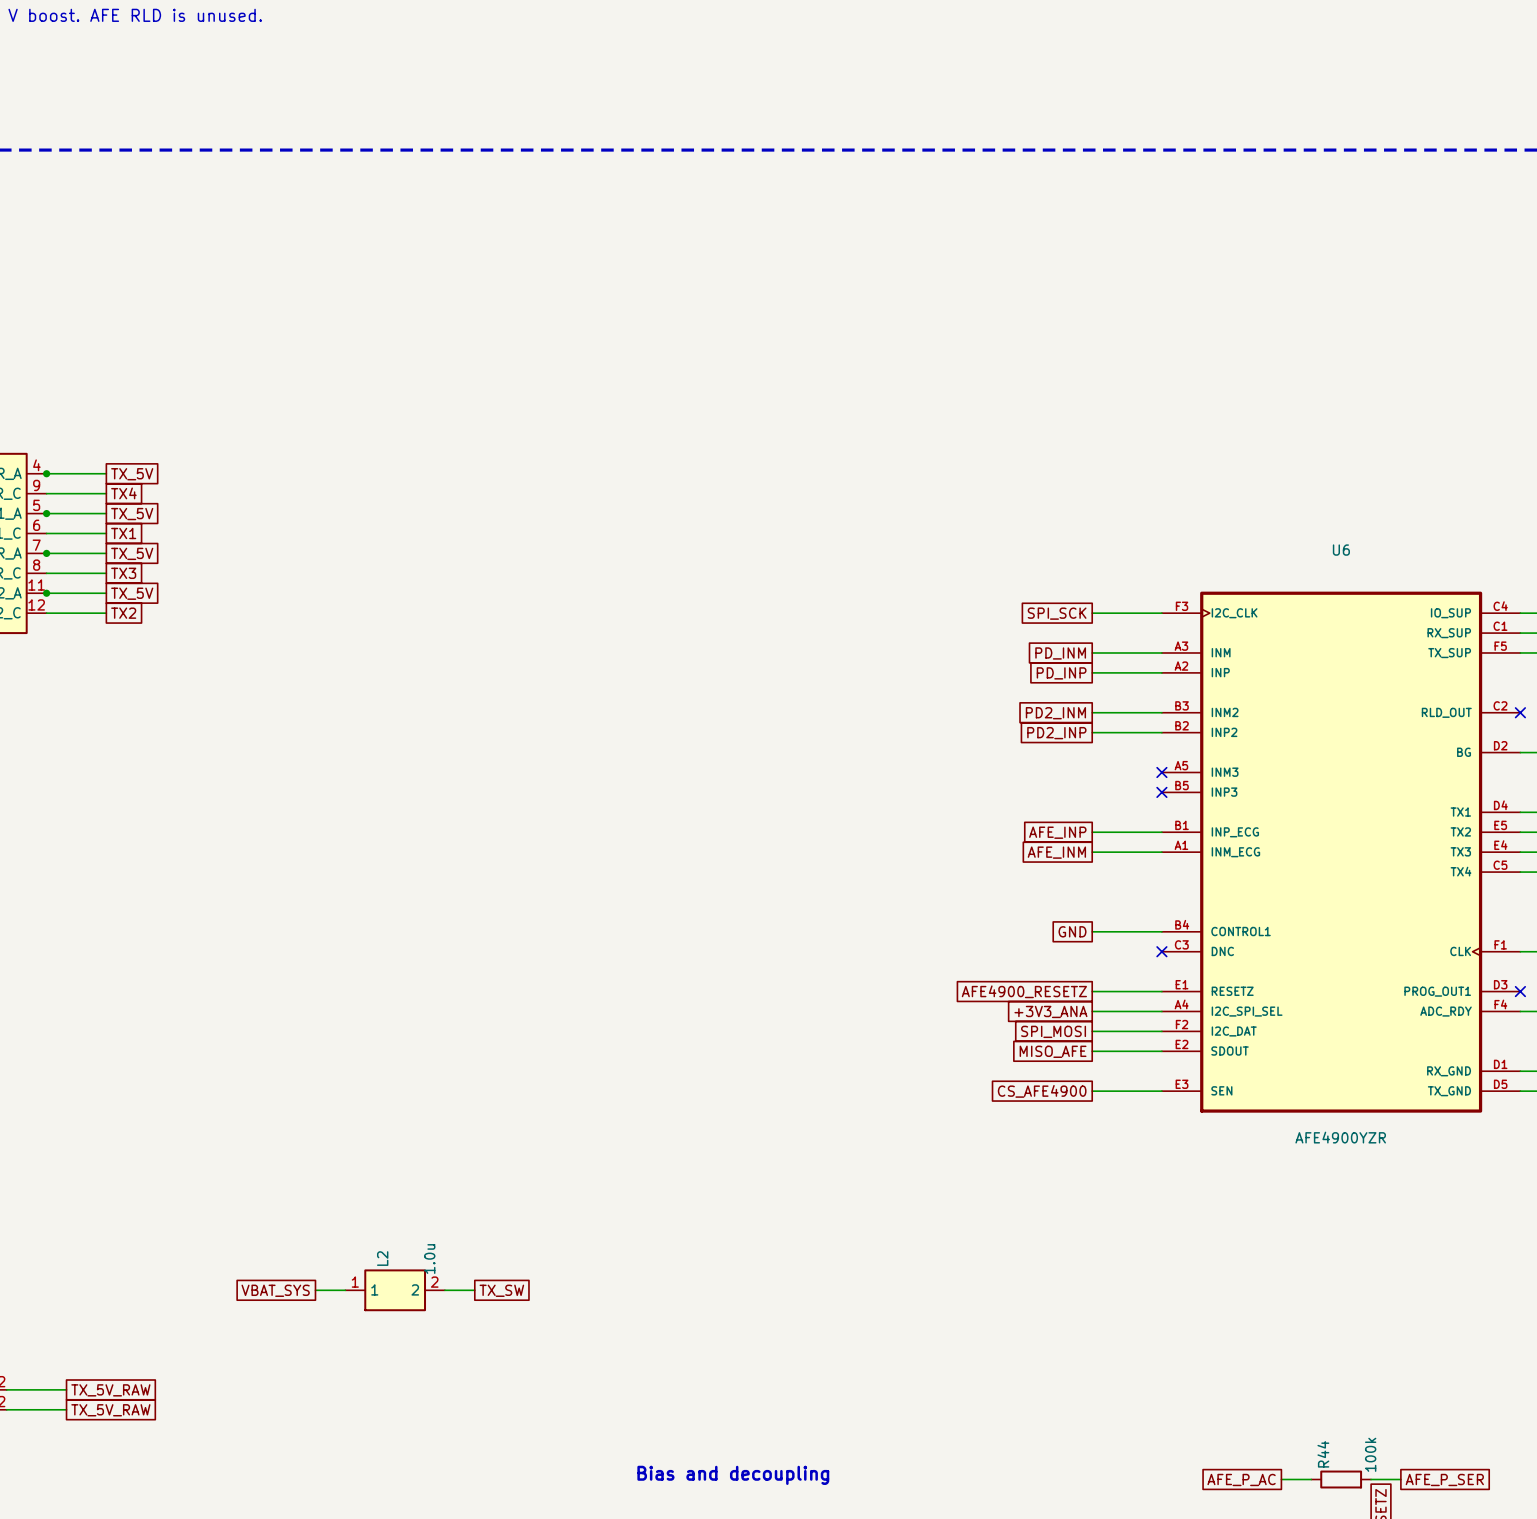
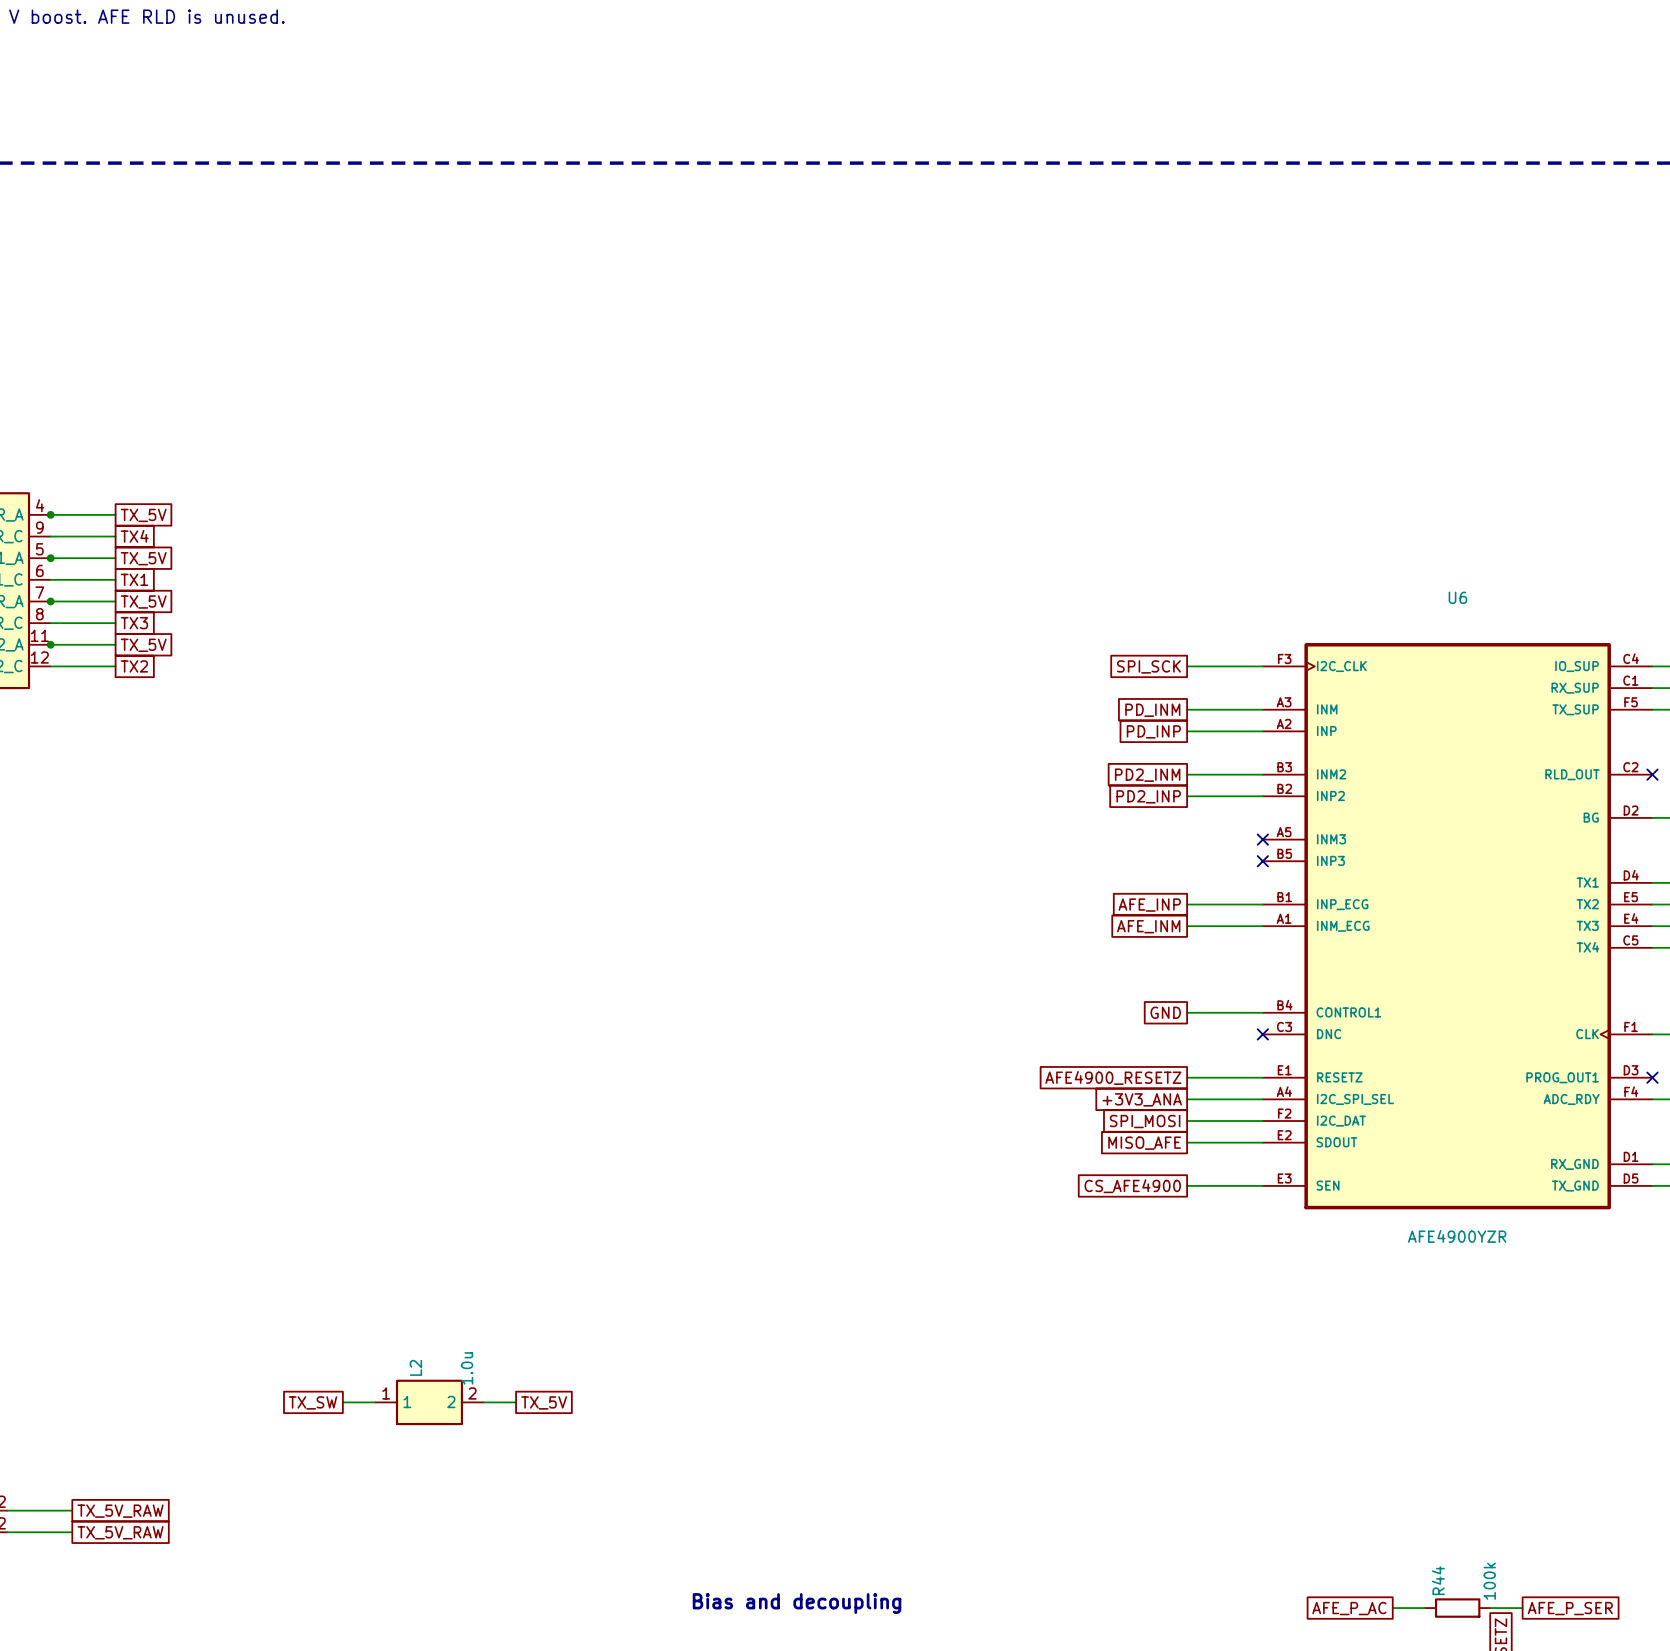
global label: VBAT_SYS (275, 1290) -> TX_SW (312, 1402)
global label: TX_SW (501, 1290) -> TX_5V (544, 1402)

